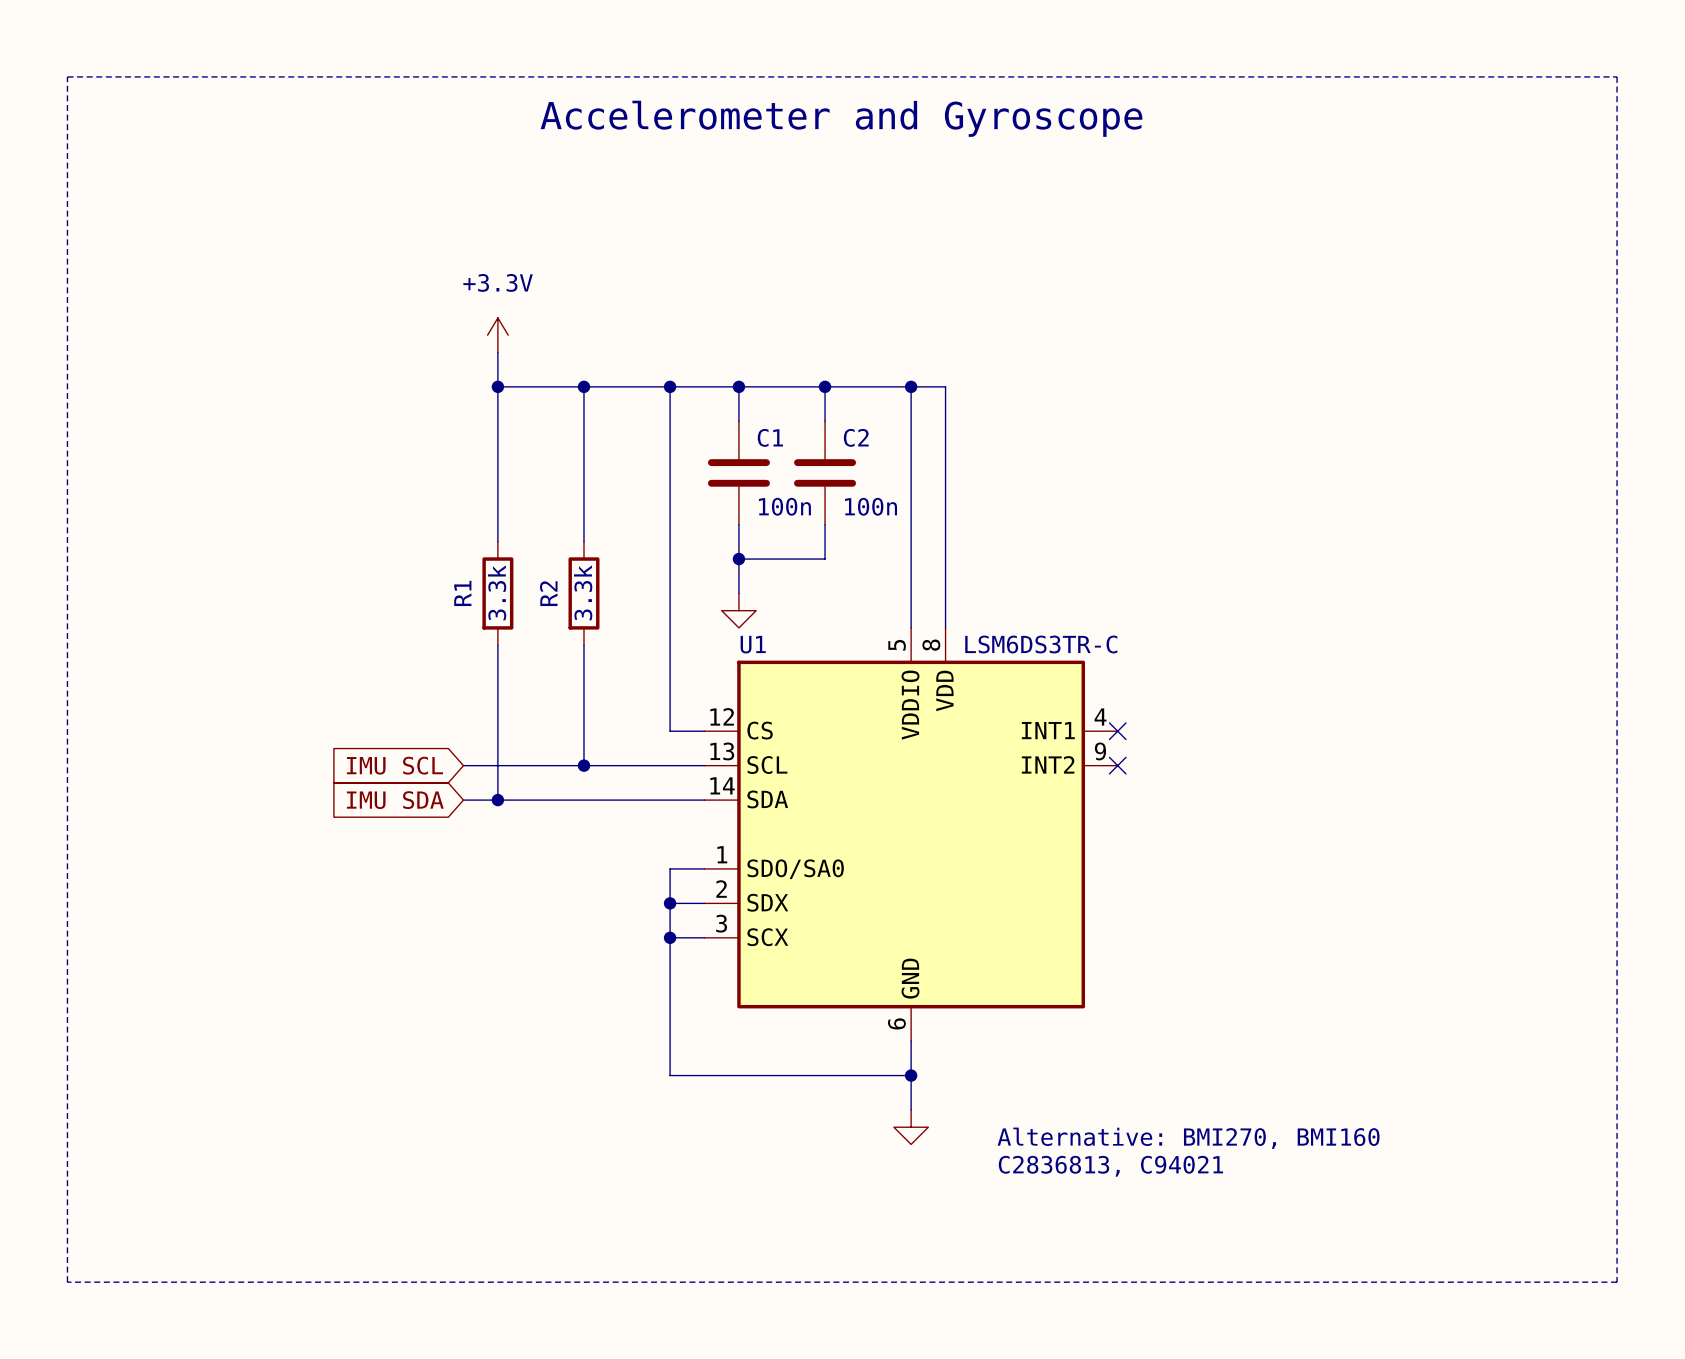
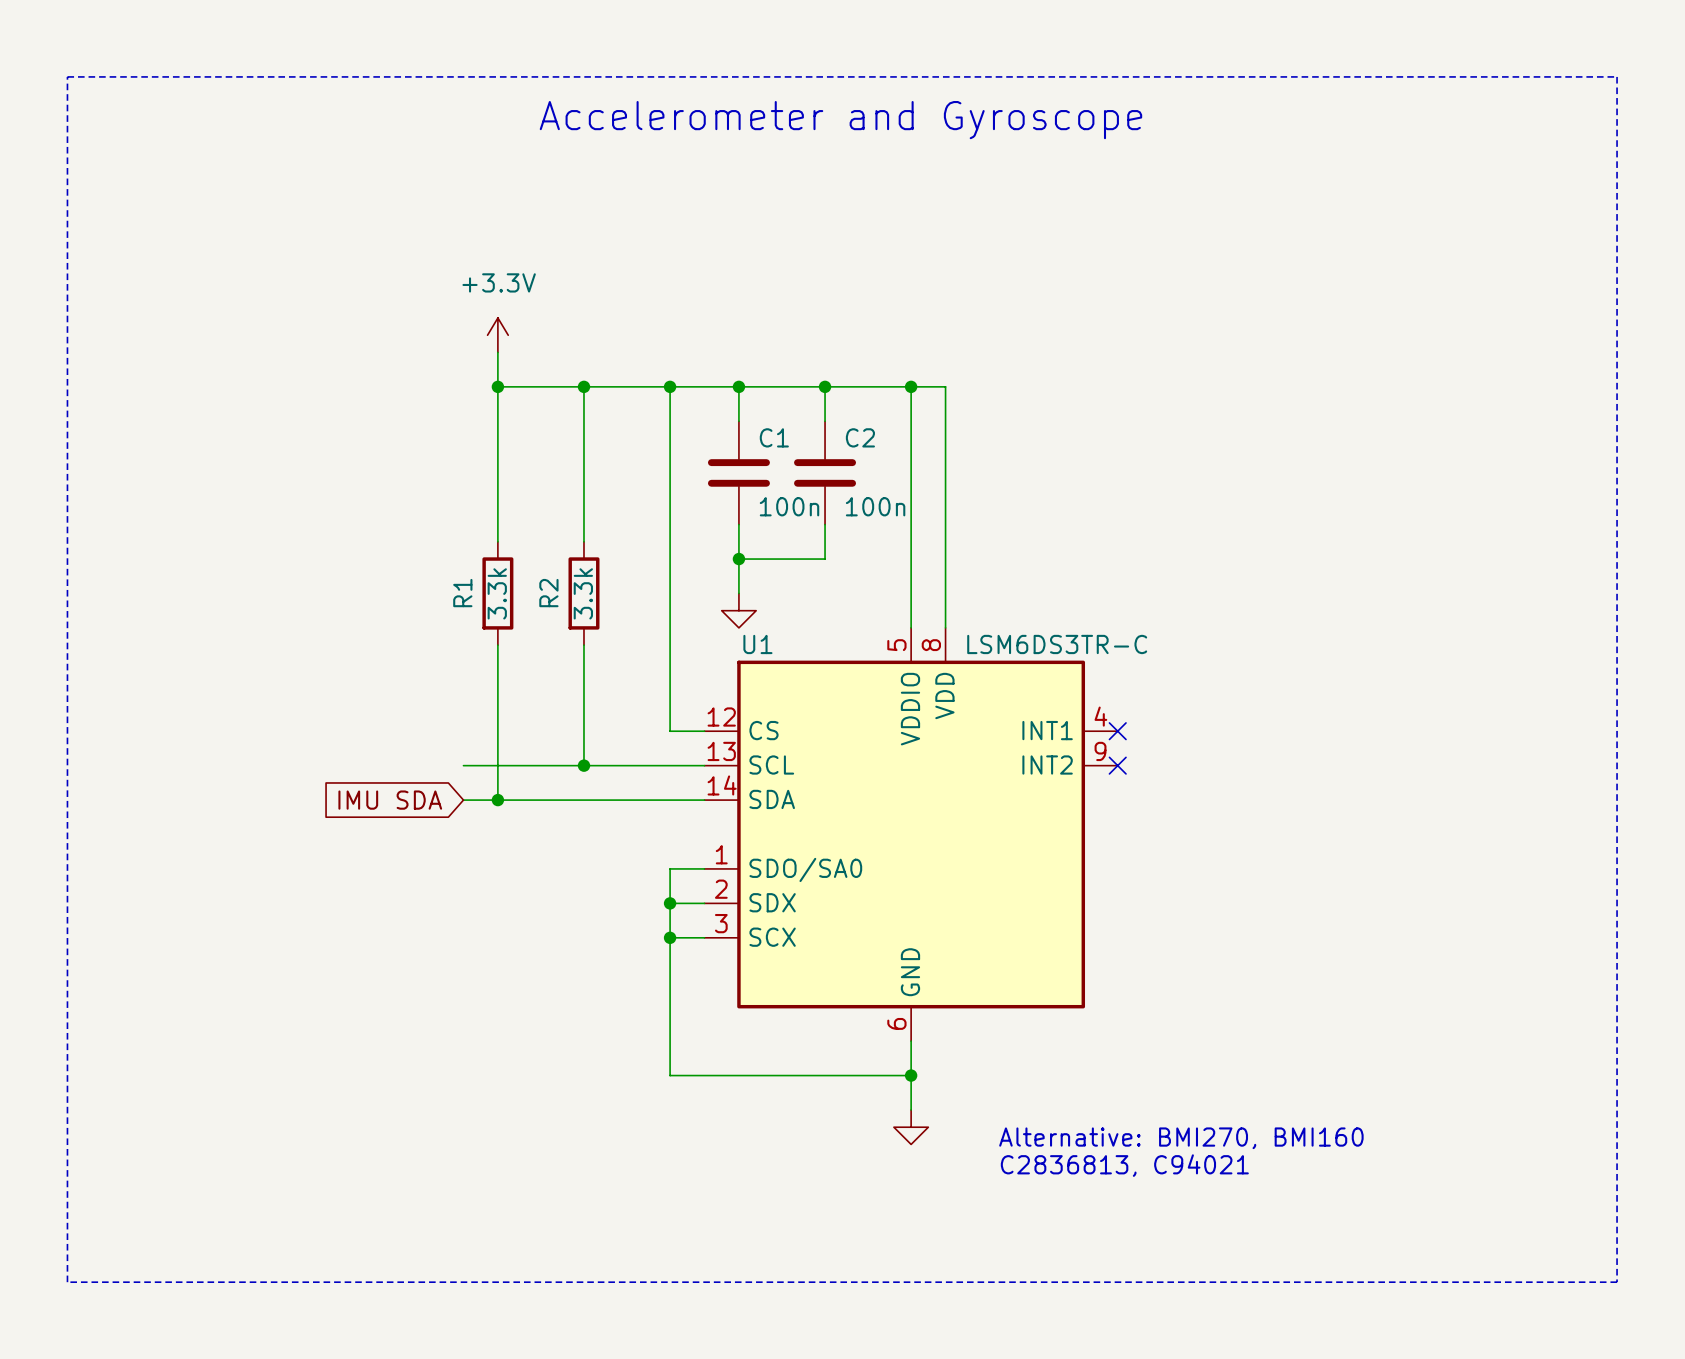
global label: IMU SCL (394, 765) -> none

